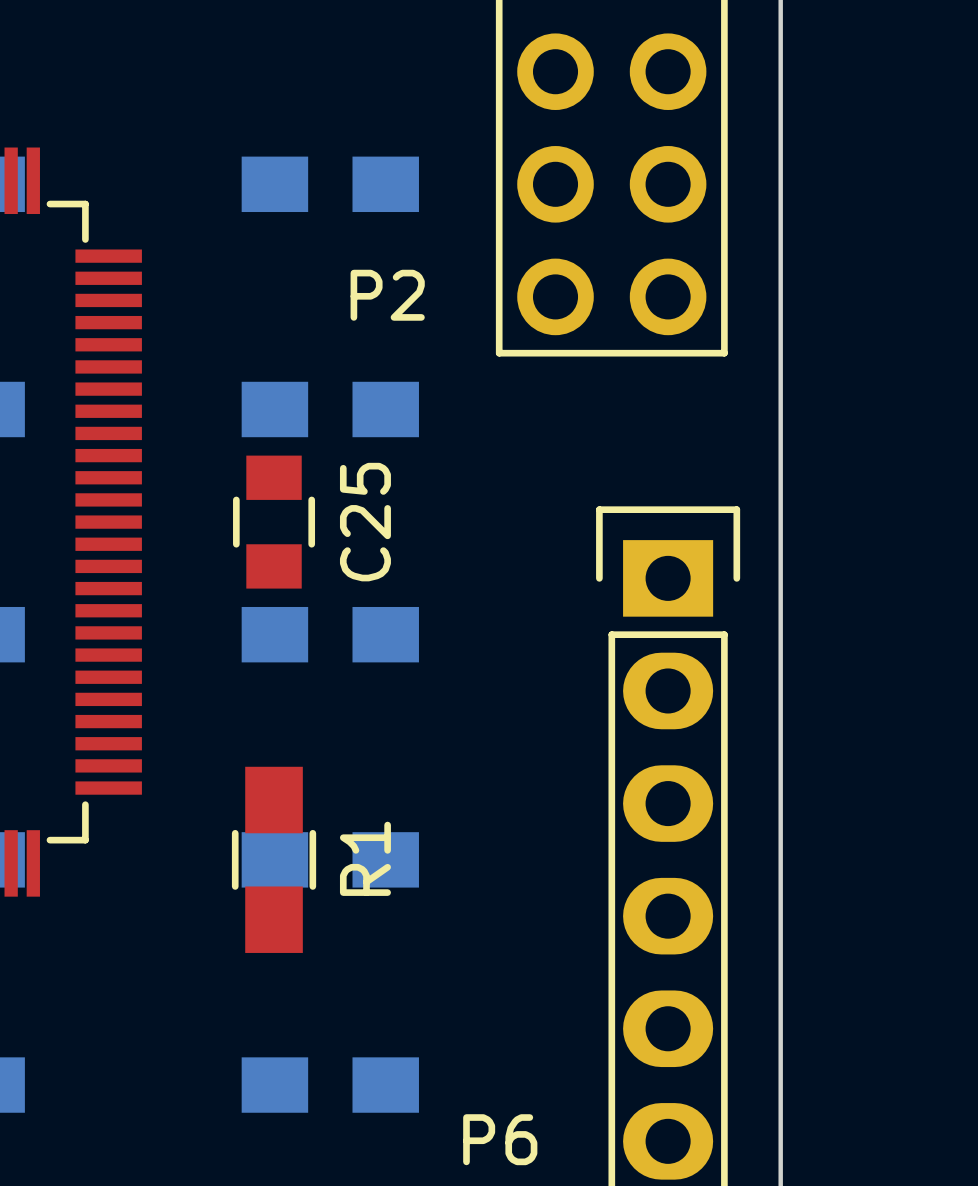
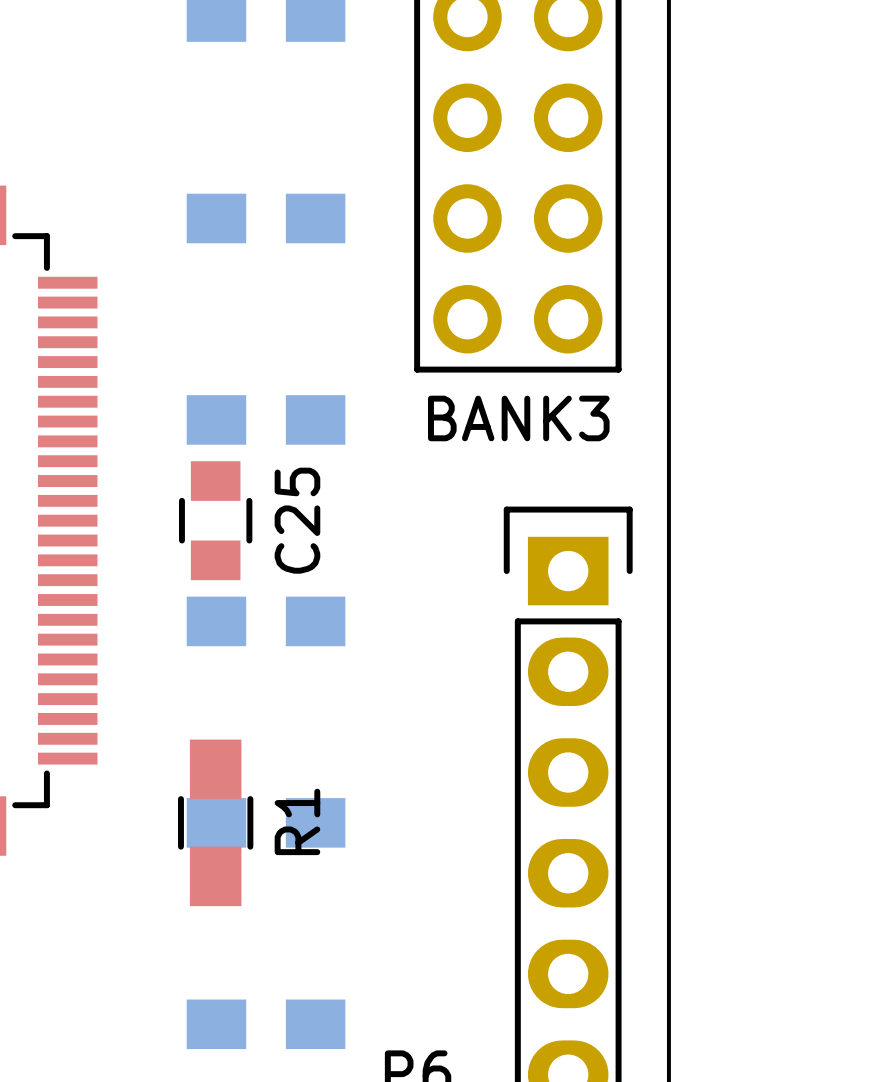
P2 name: P2 (387, 295) -> none
P2 value: none -> BANK3 (518, 418)

